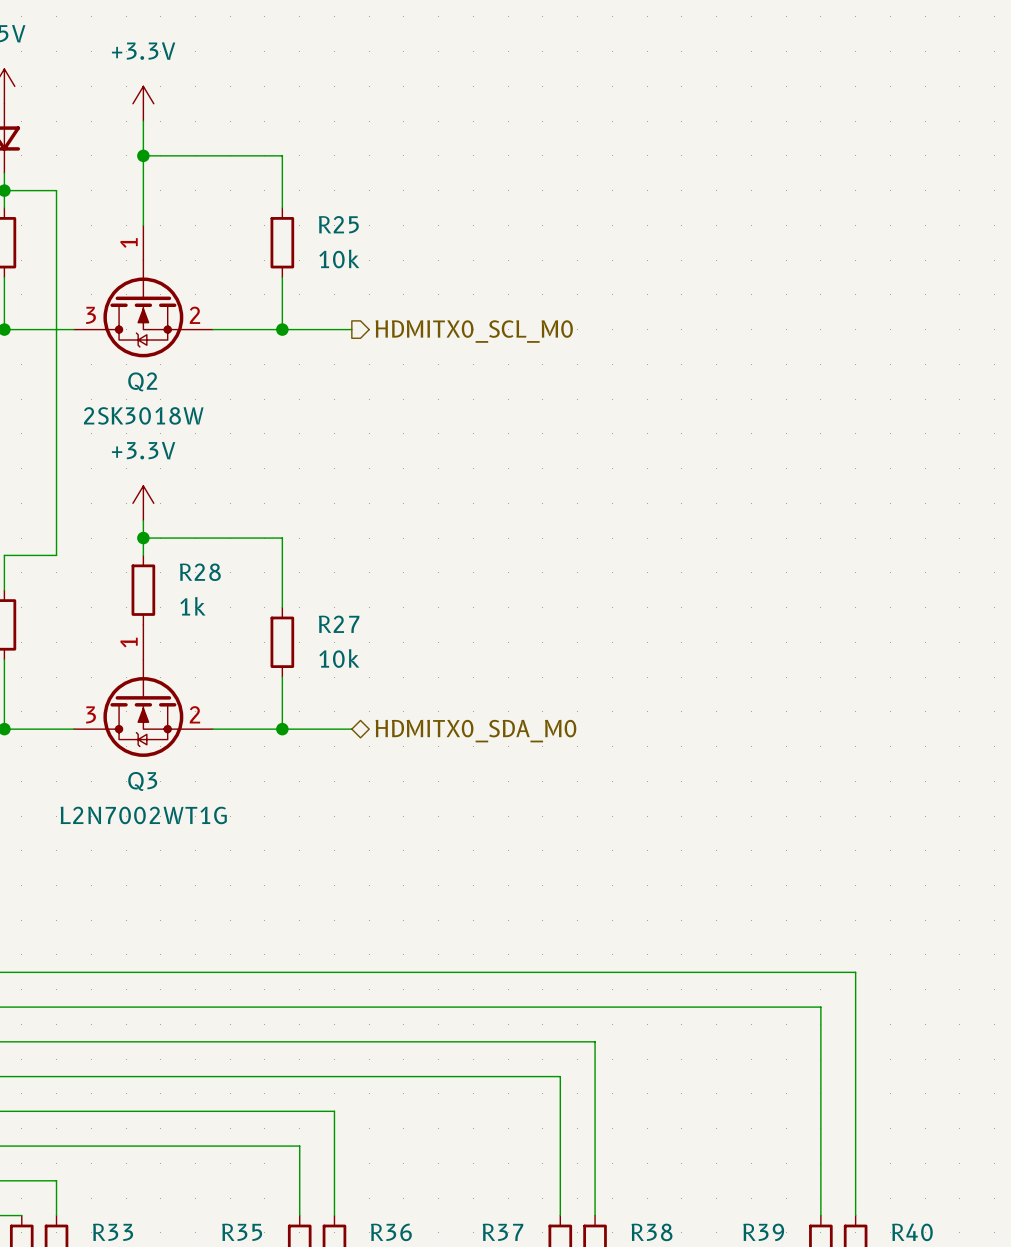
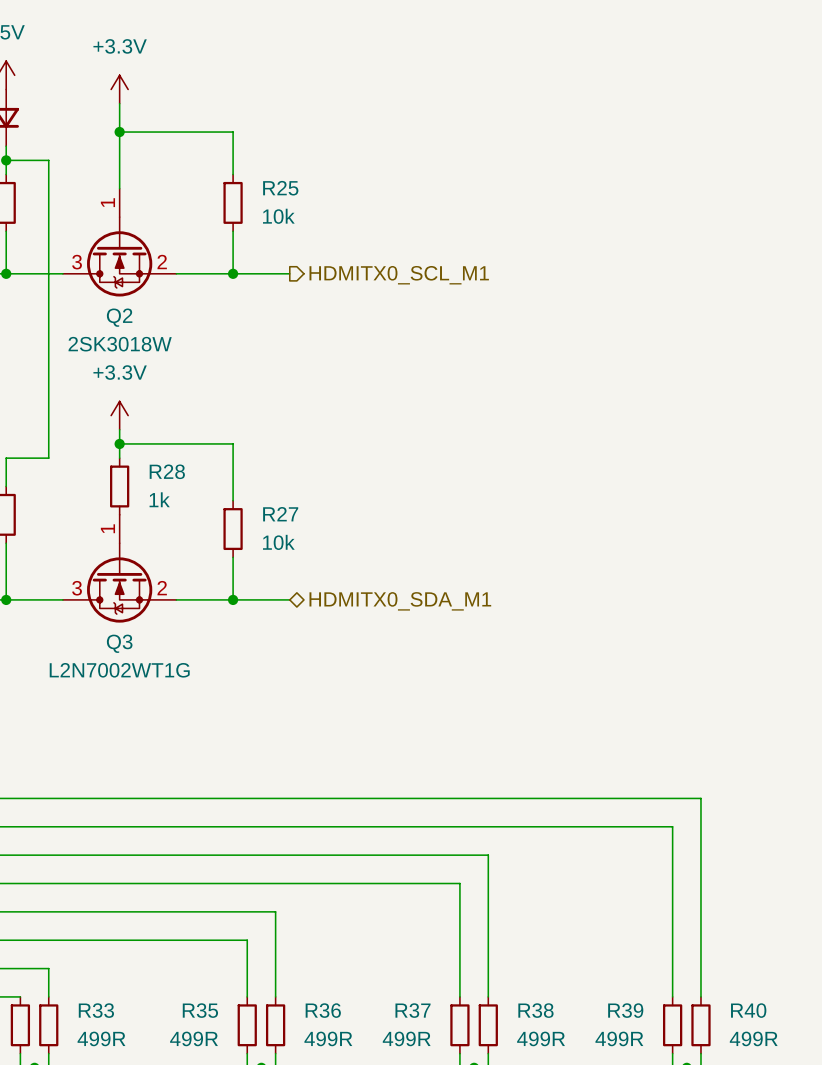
hierarchical label: HDMITX0_SCL_M0 (474, 331) -> HDMITX0_SCL_M1 (399, 275)
hierarchical label: HDMITX0_SDA_M0 (475, 731) -> HDMITX0_SDA_M1 (400, 601)

